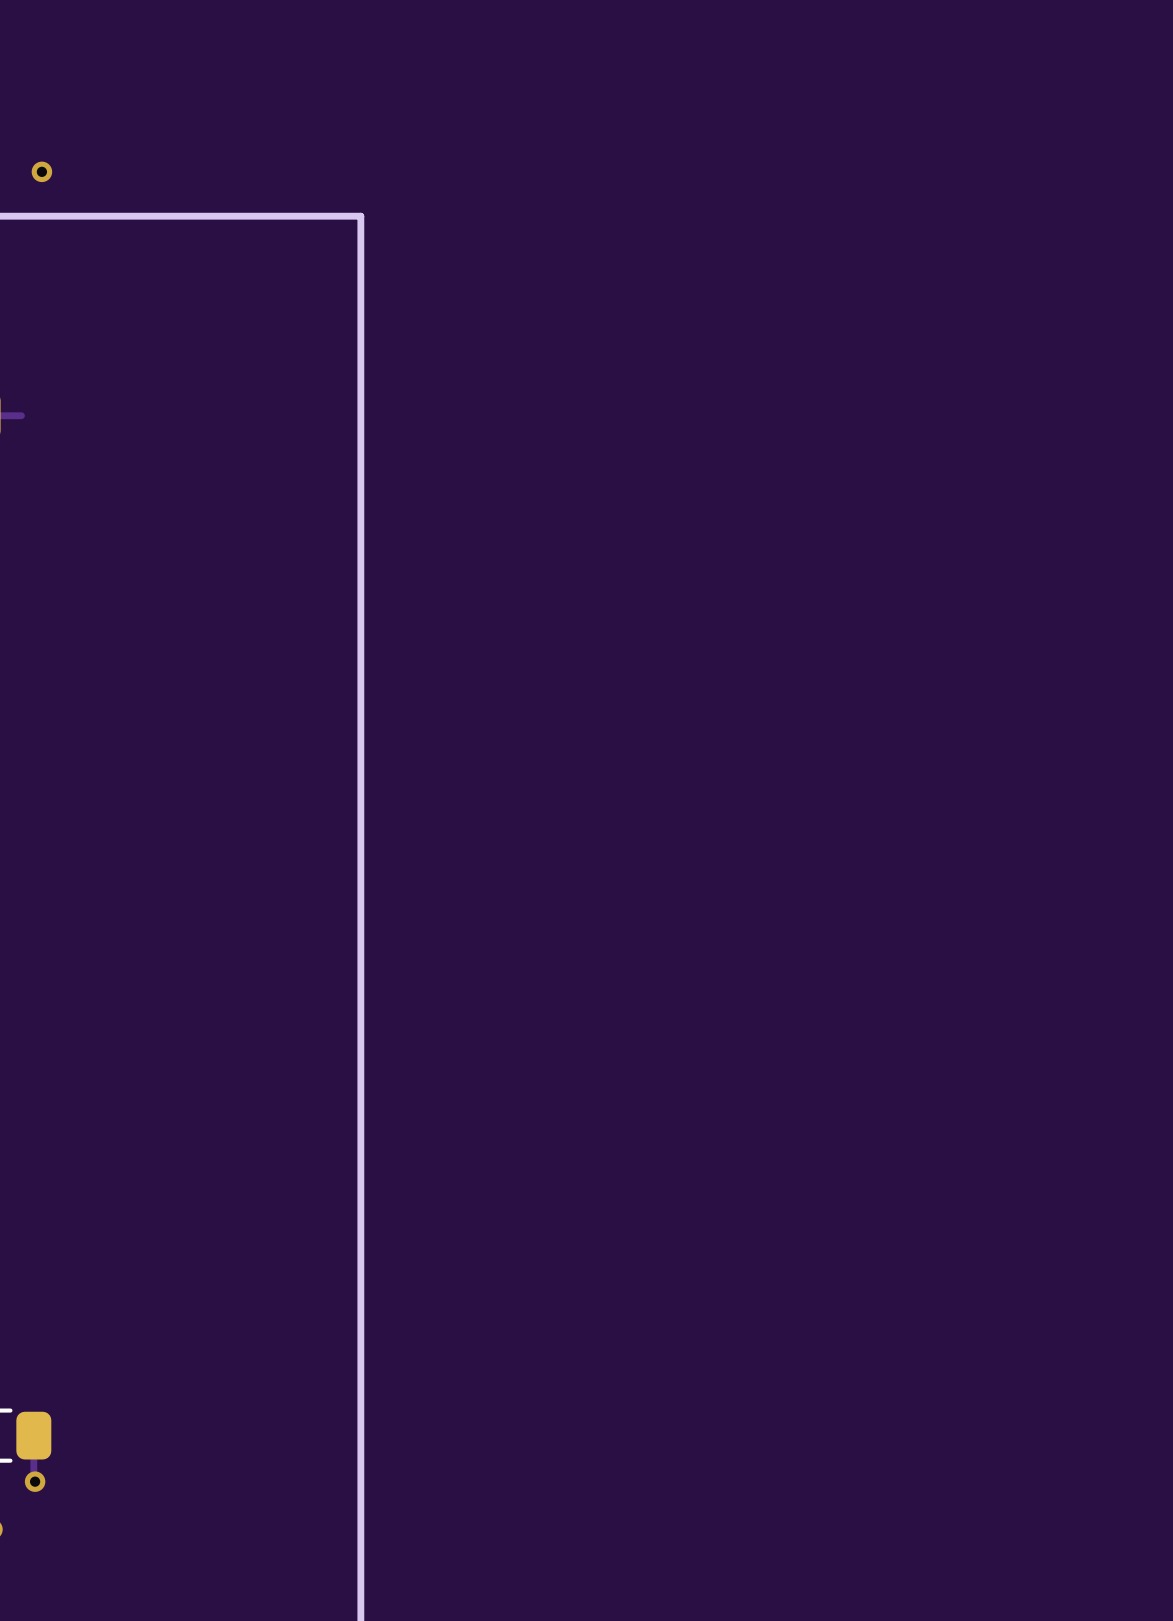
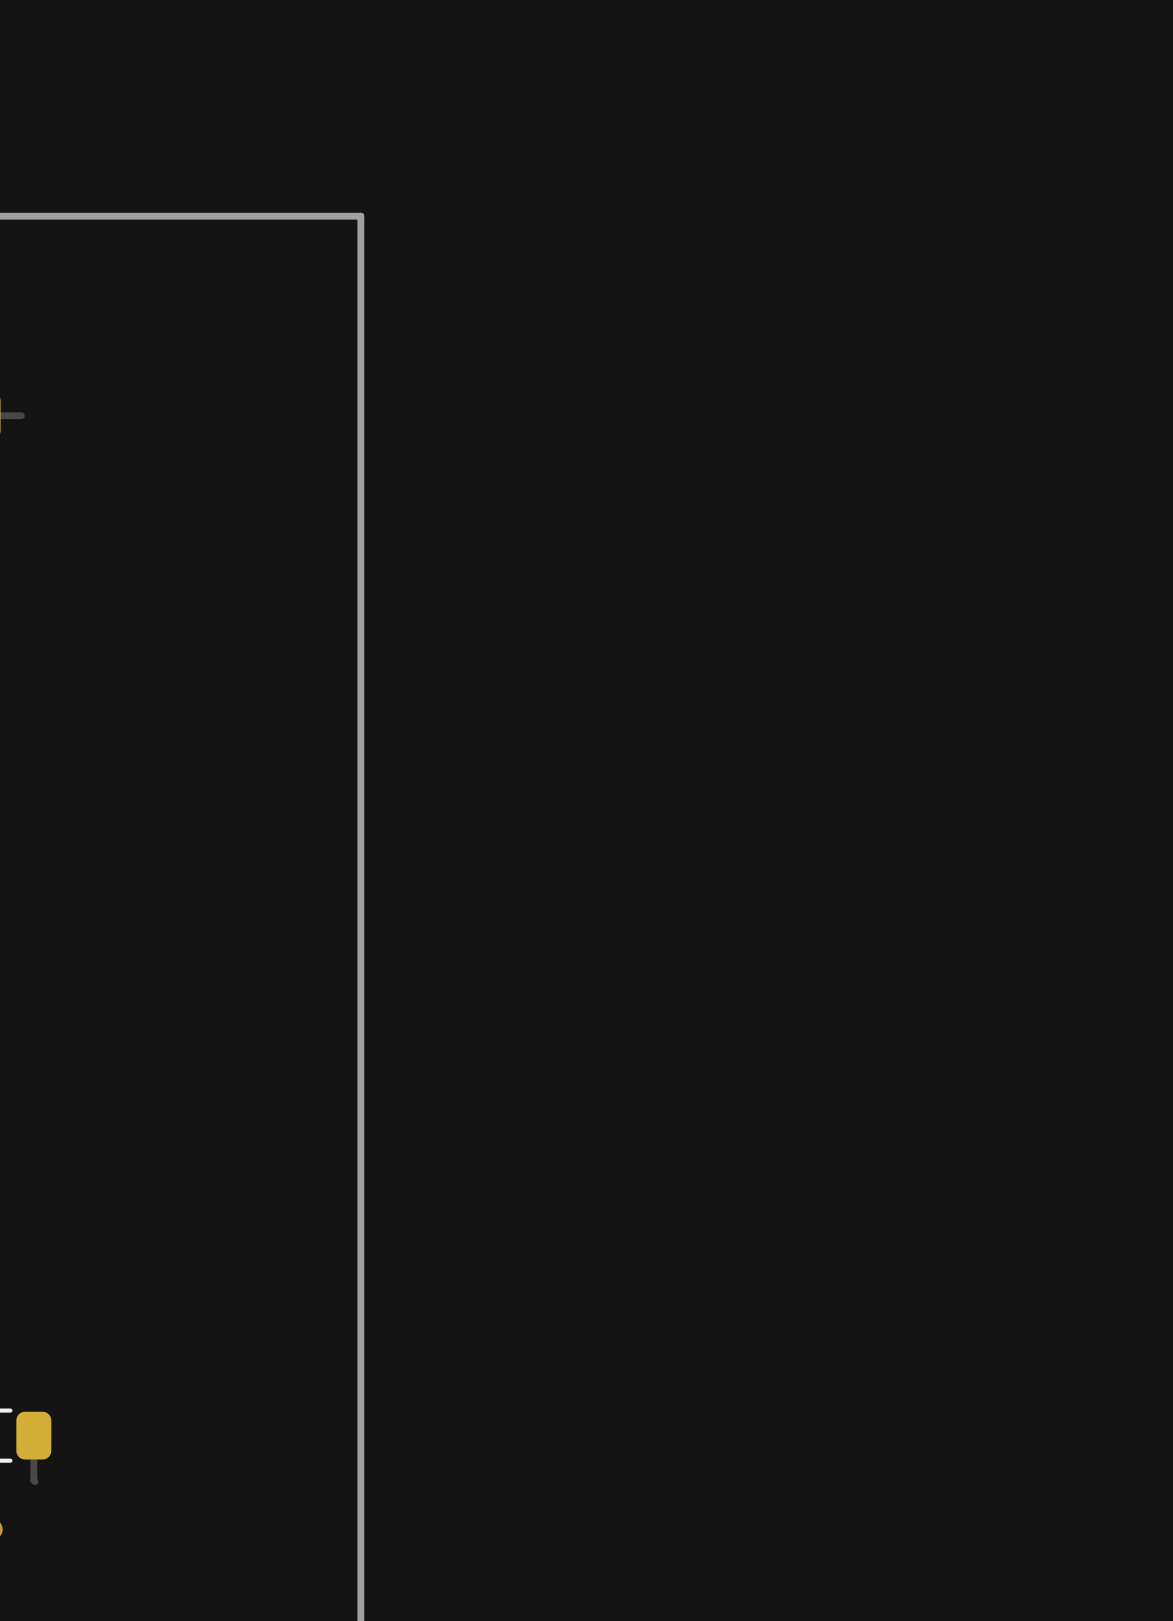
via: (41, 171) -> none
via: (35, 1481) -> none

